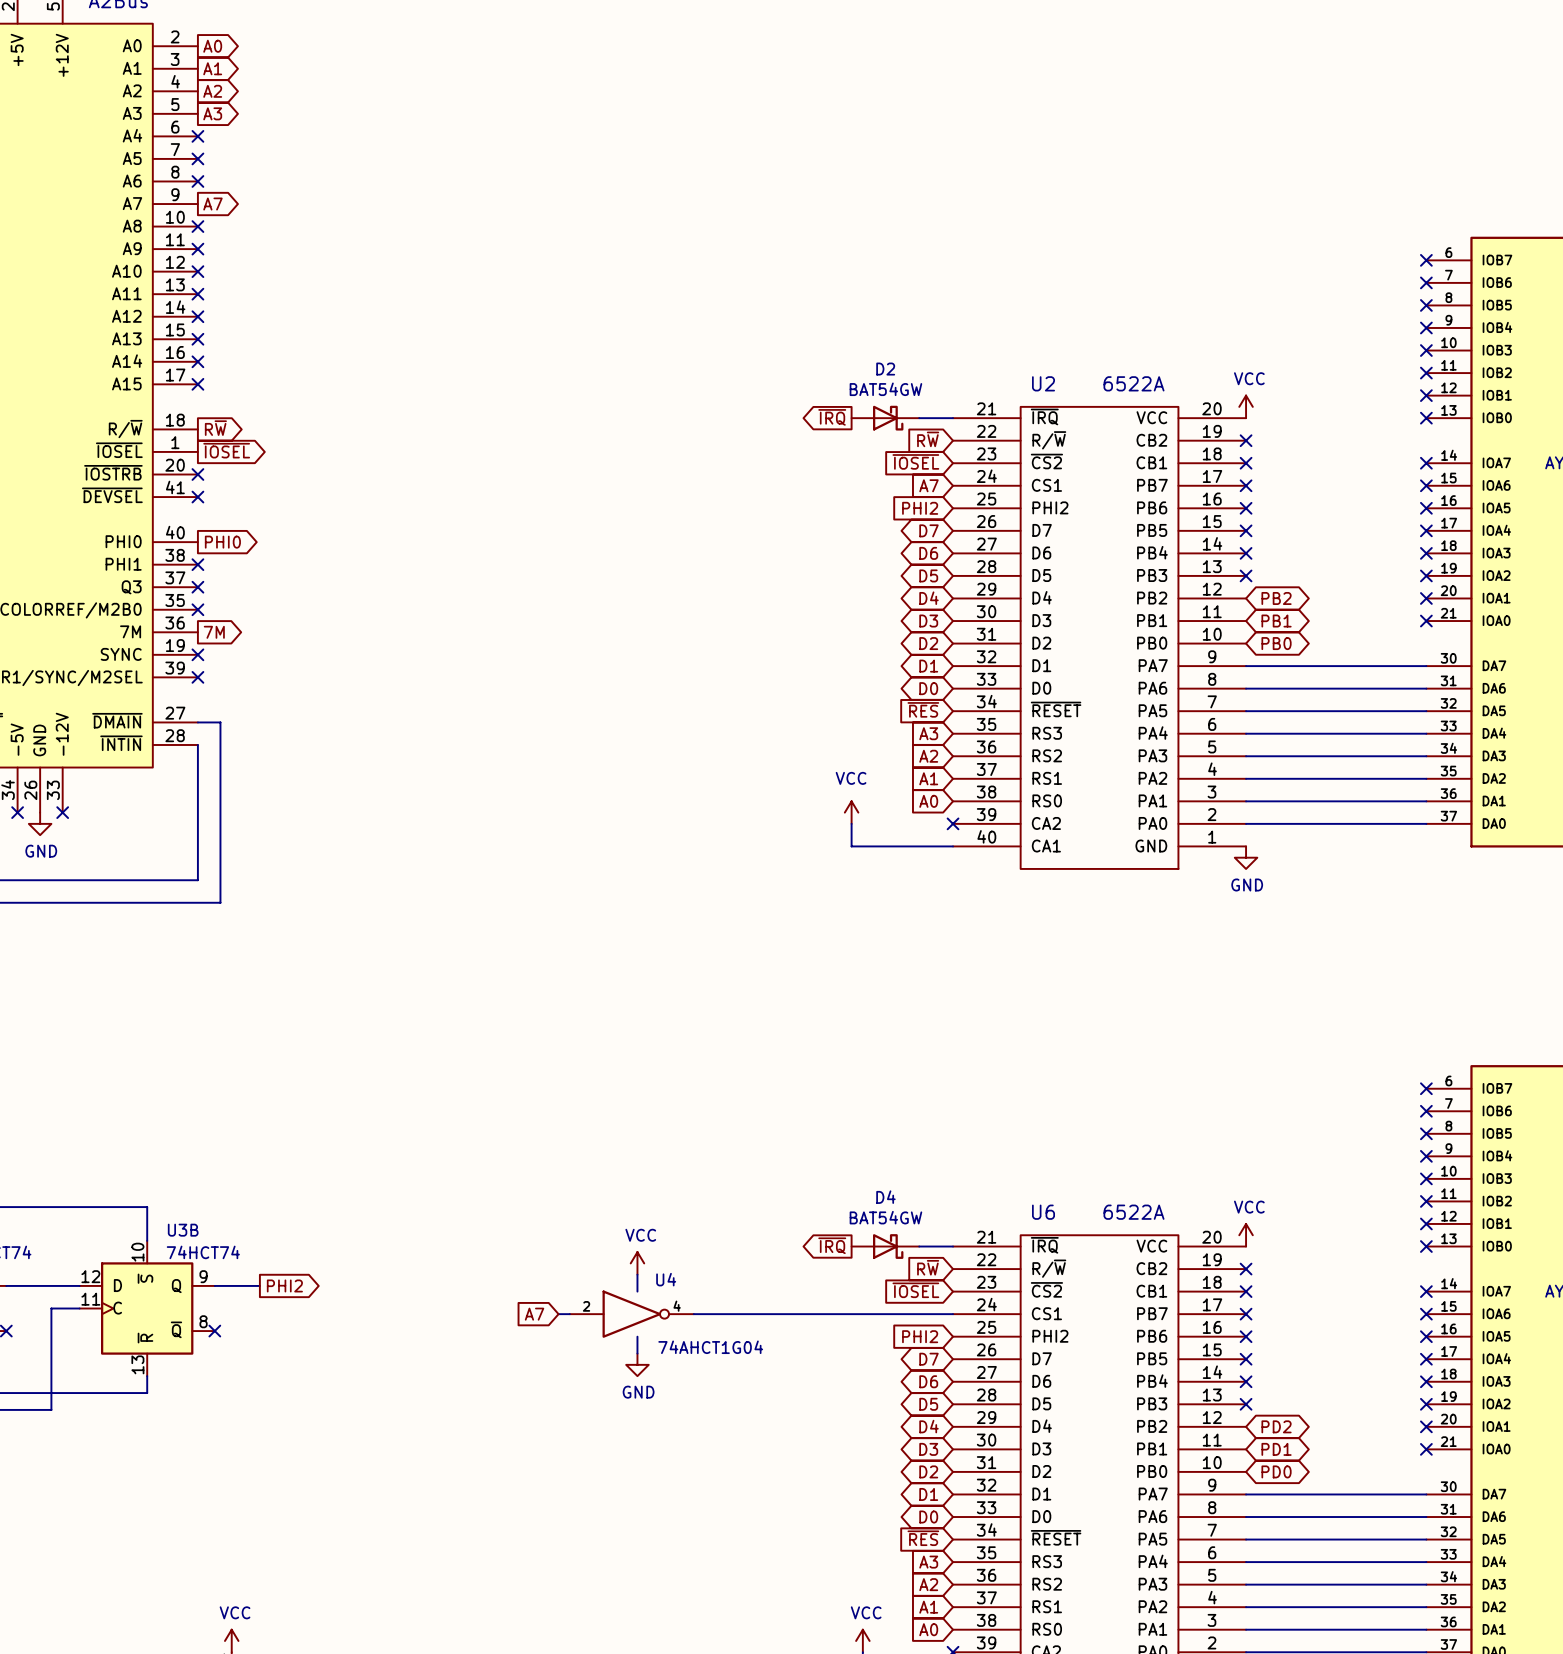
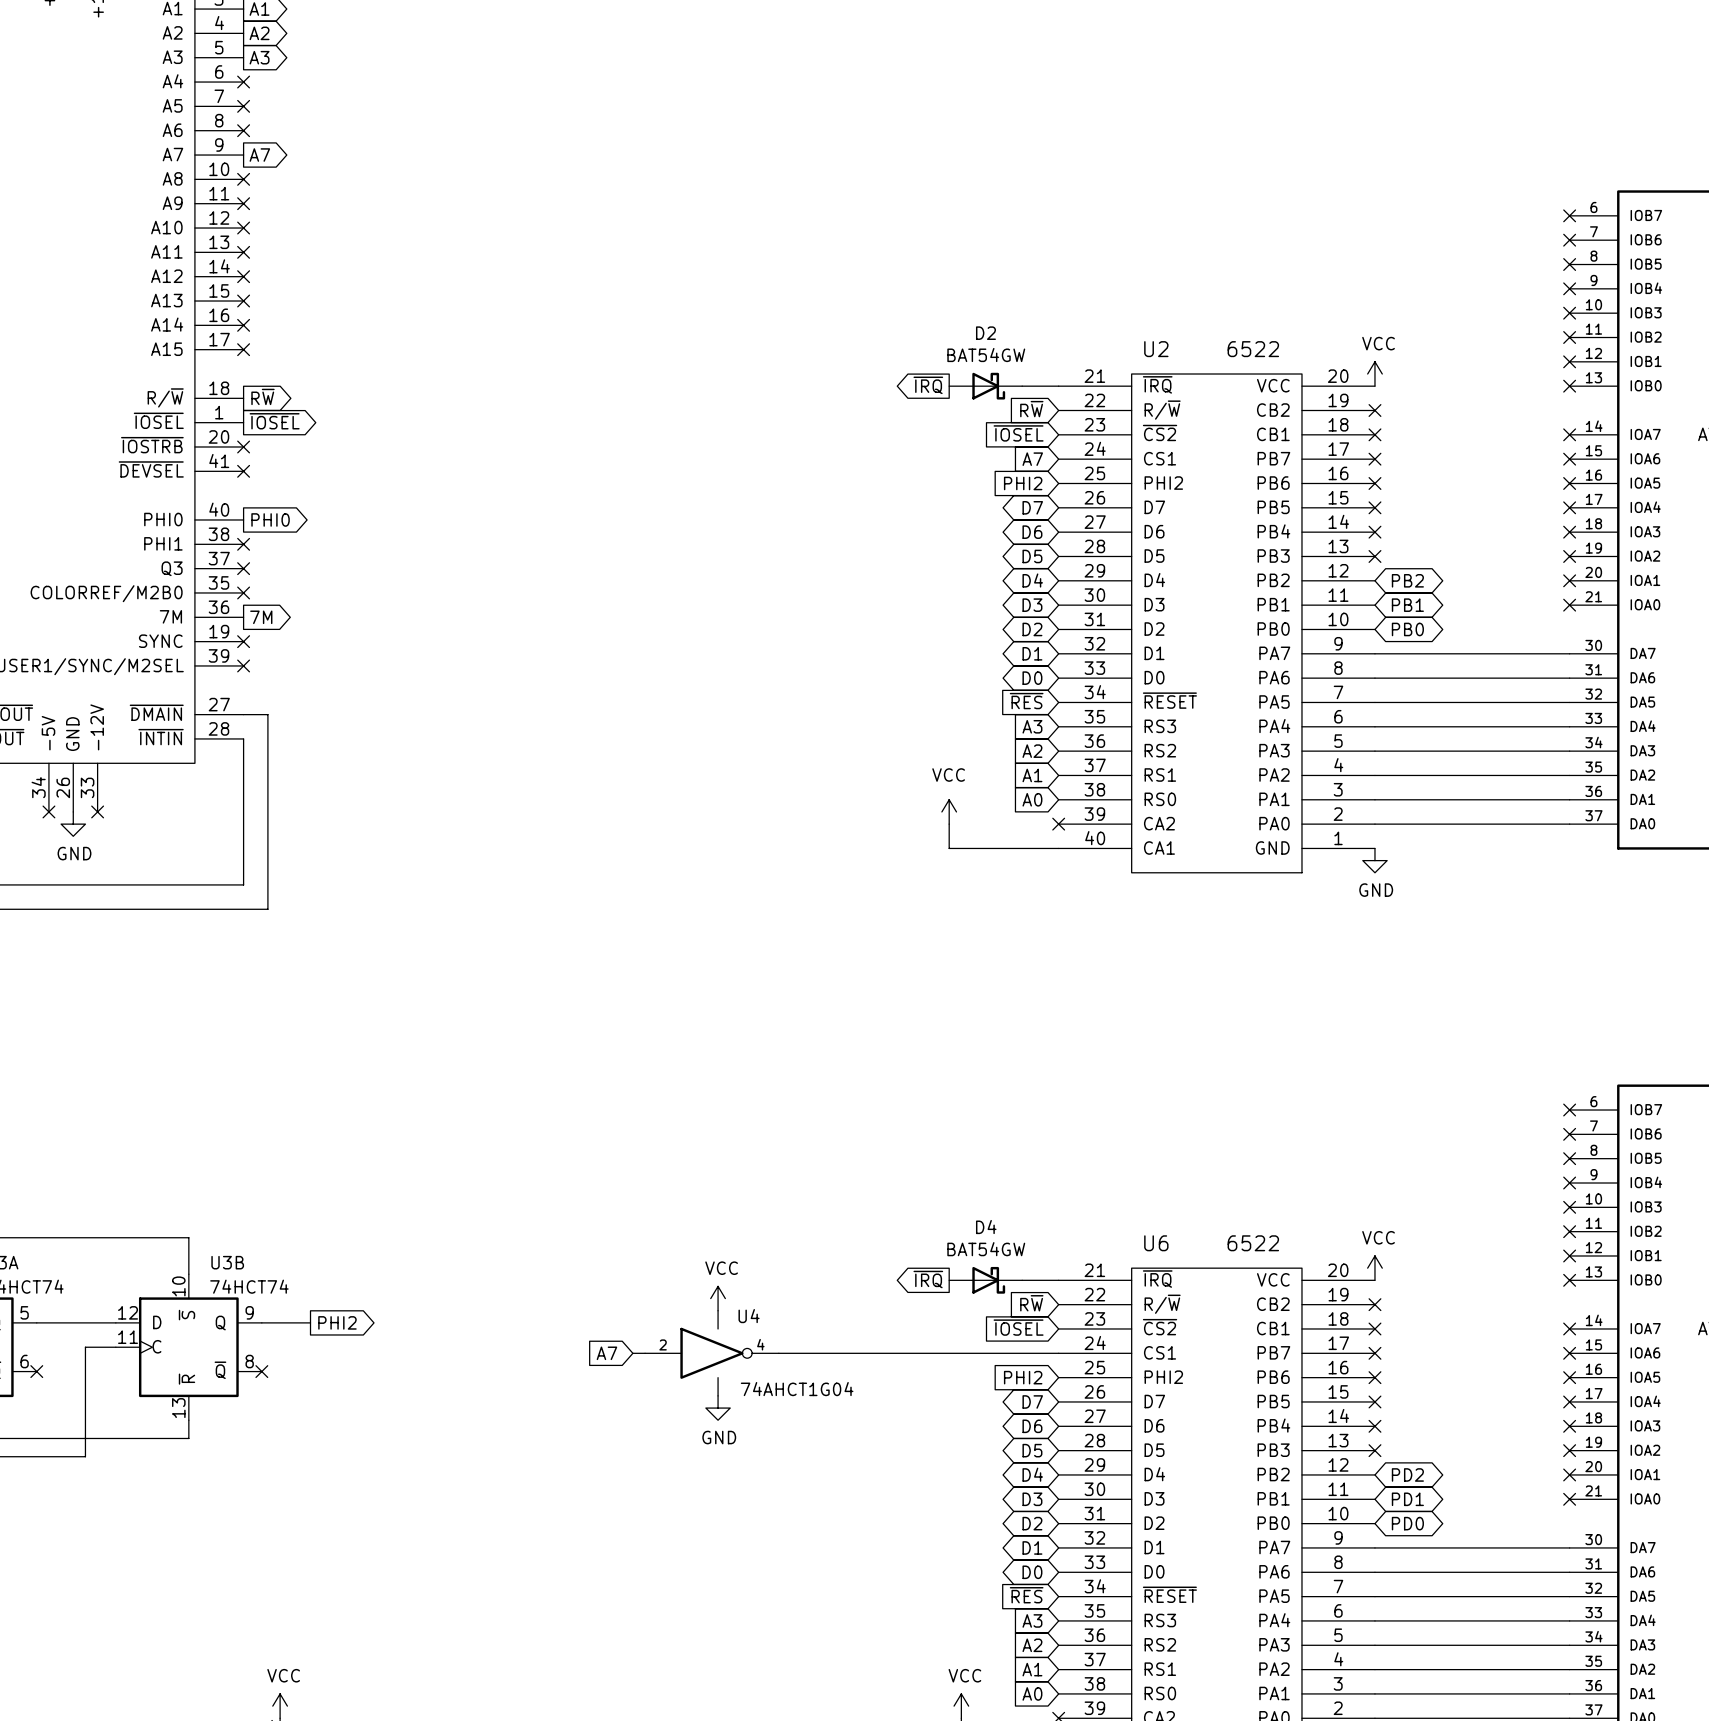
U2 value: 6522A (1134, 383) -> 6522 (1253, 349)
U6 value: 6522A (1134, 1212) -> 6522 (1253, 1243)

